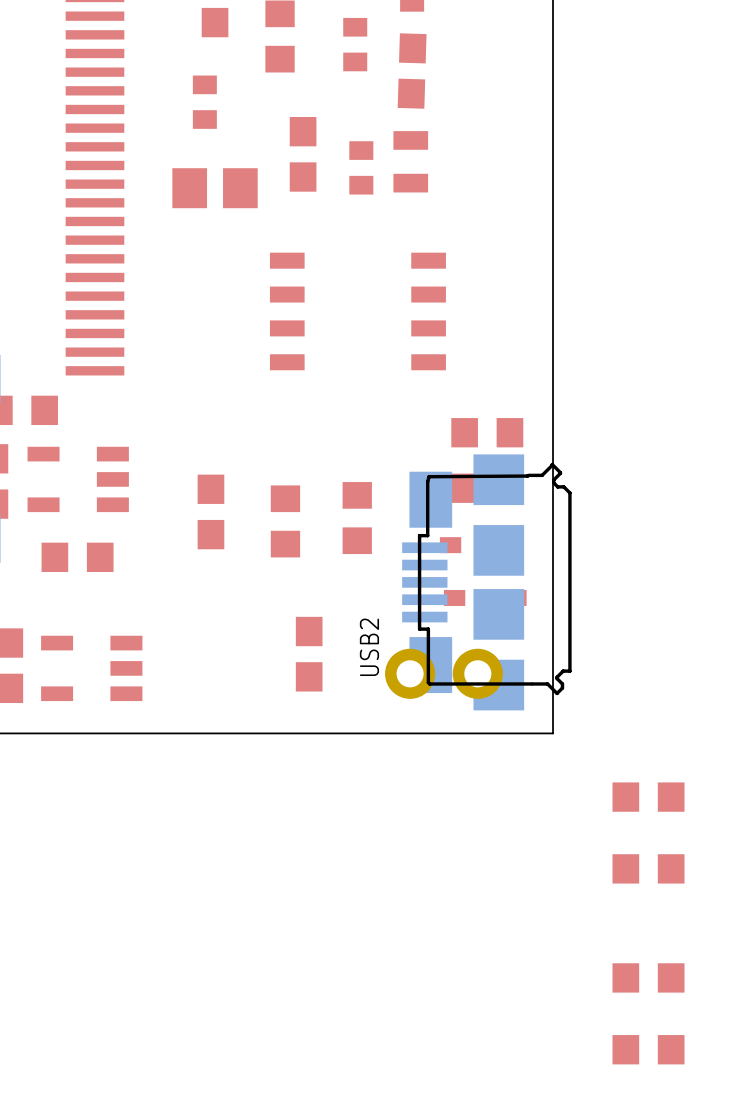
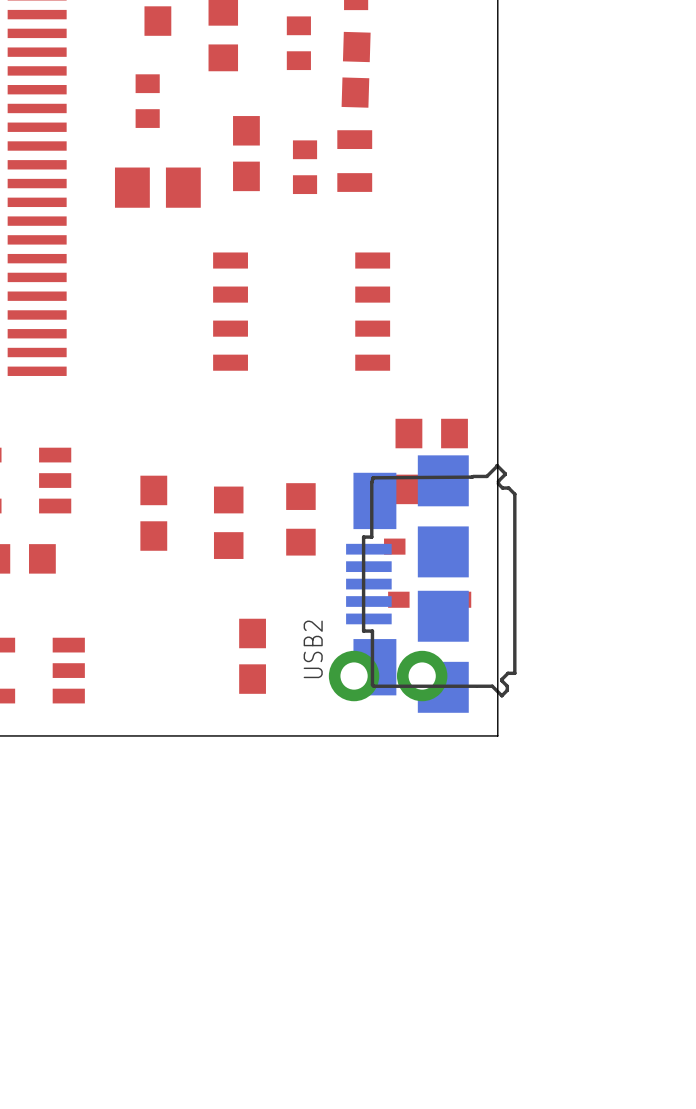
part: (648, 797) -> none
part: (648, 868) -> none
part: (648, 977) -> none
part: (648, 1049) -> none

